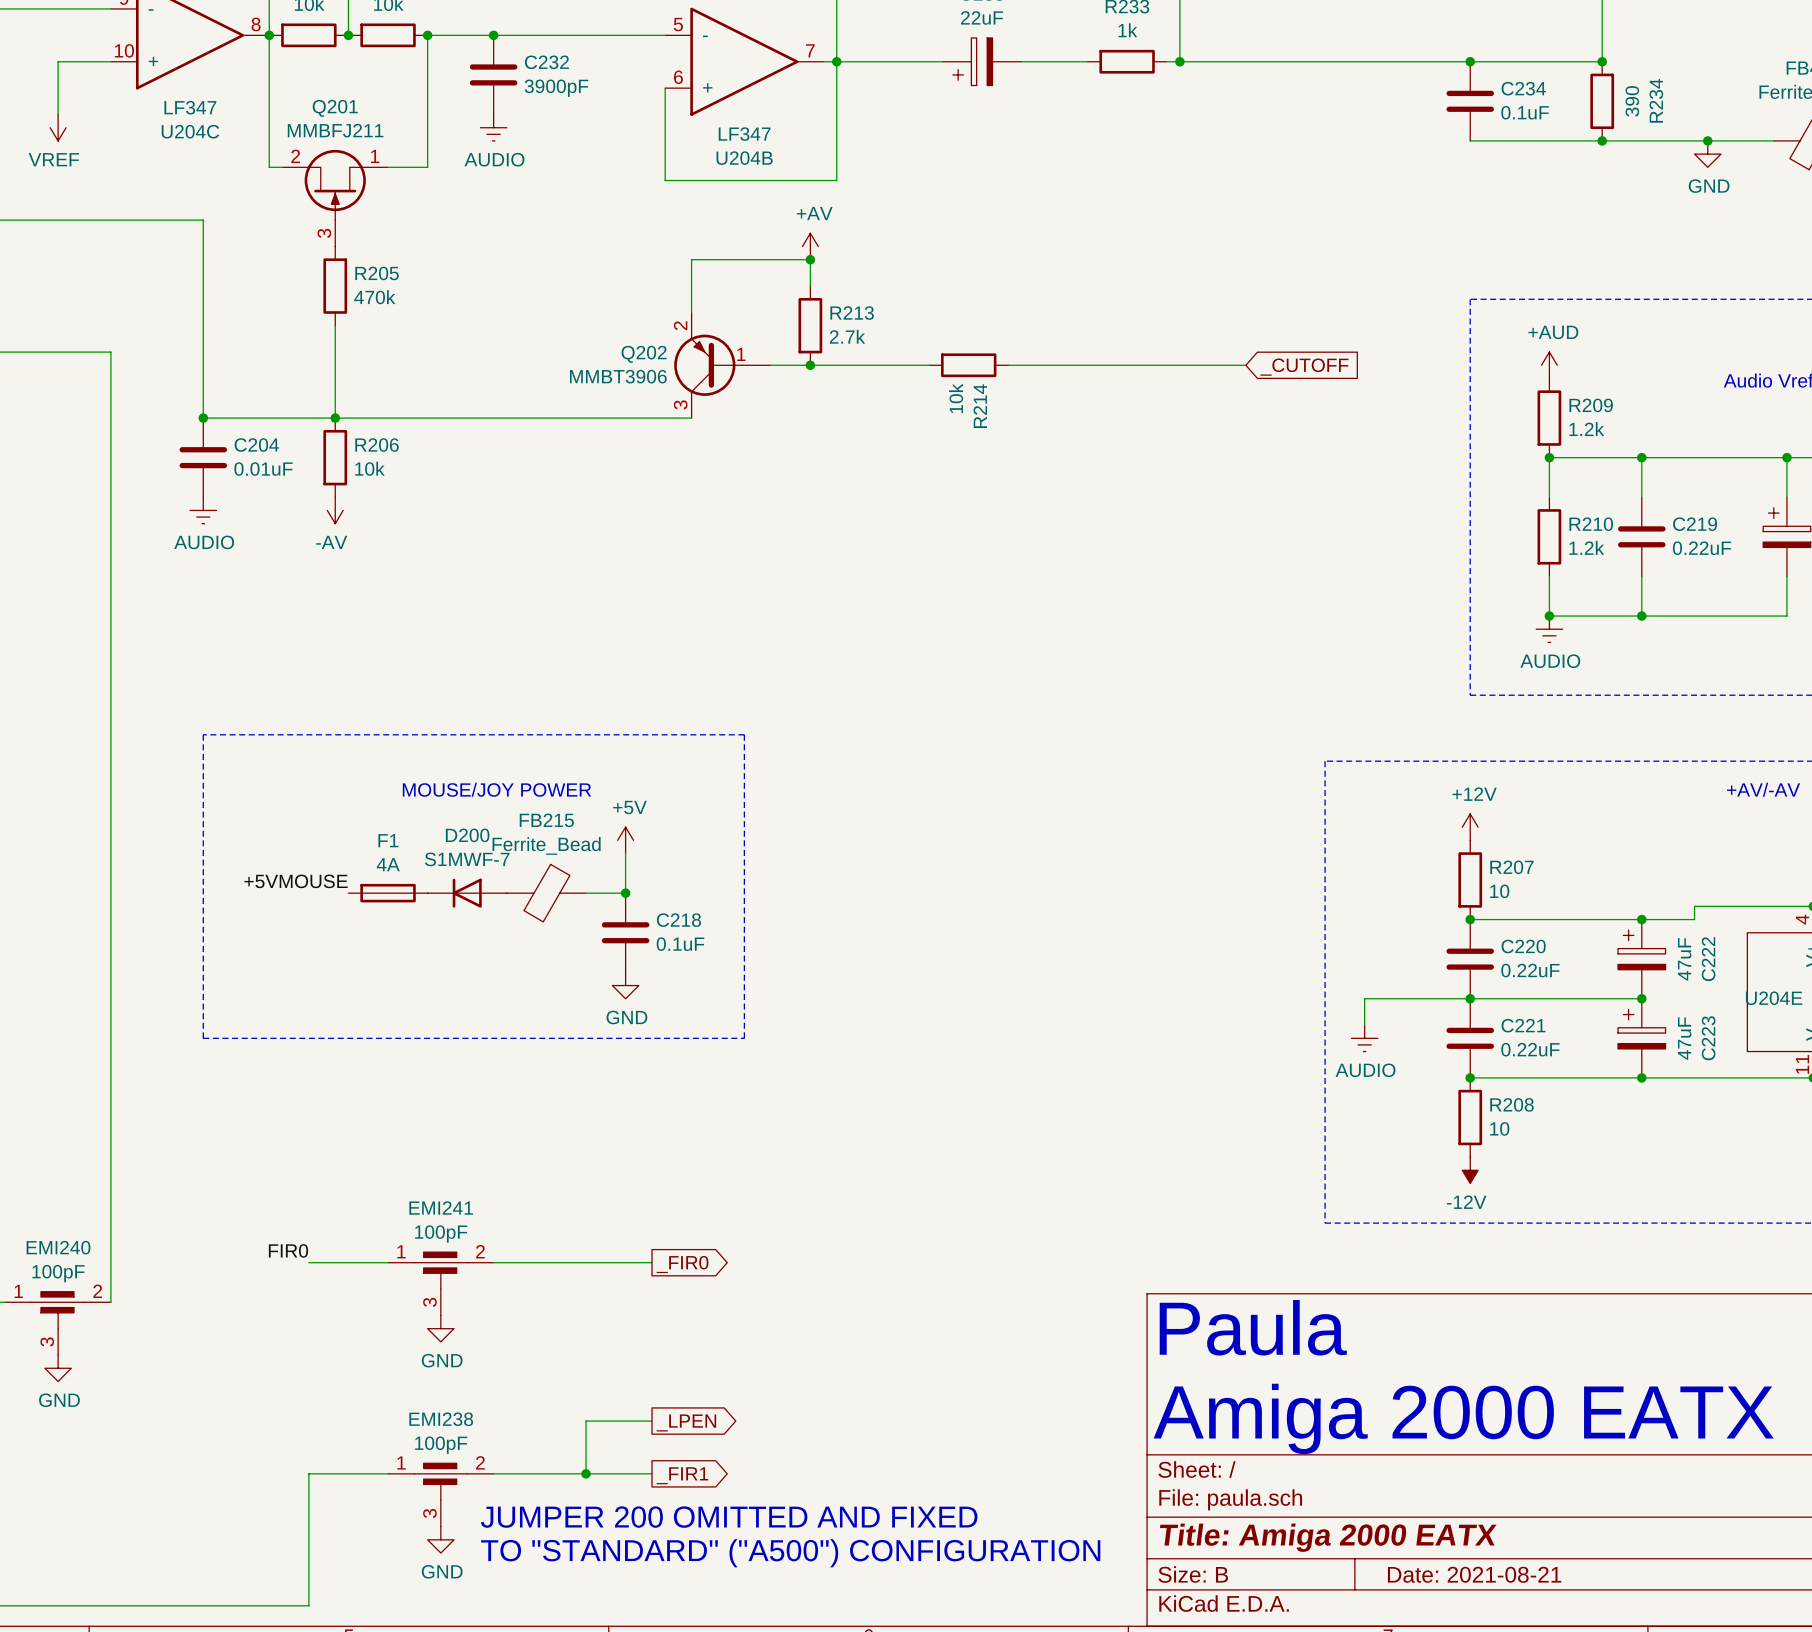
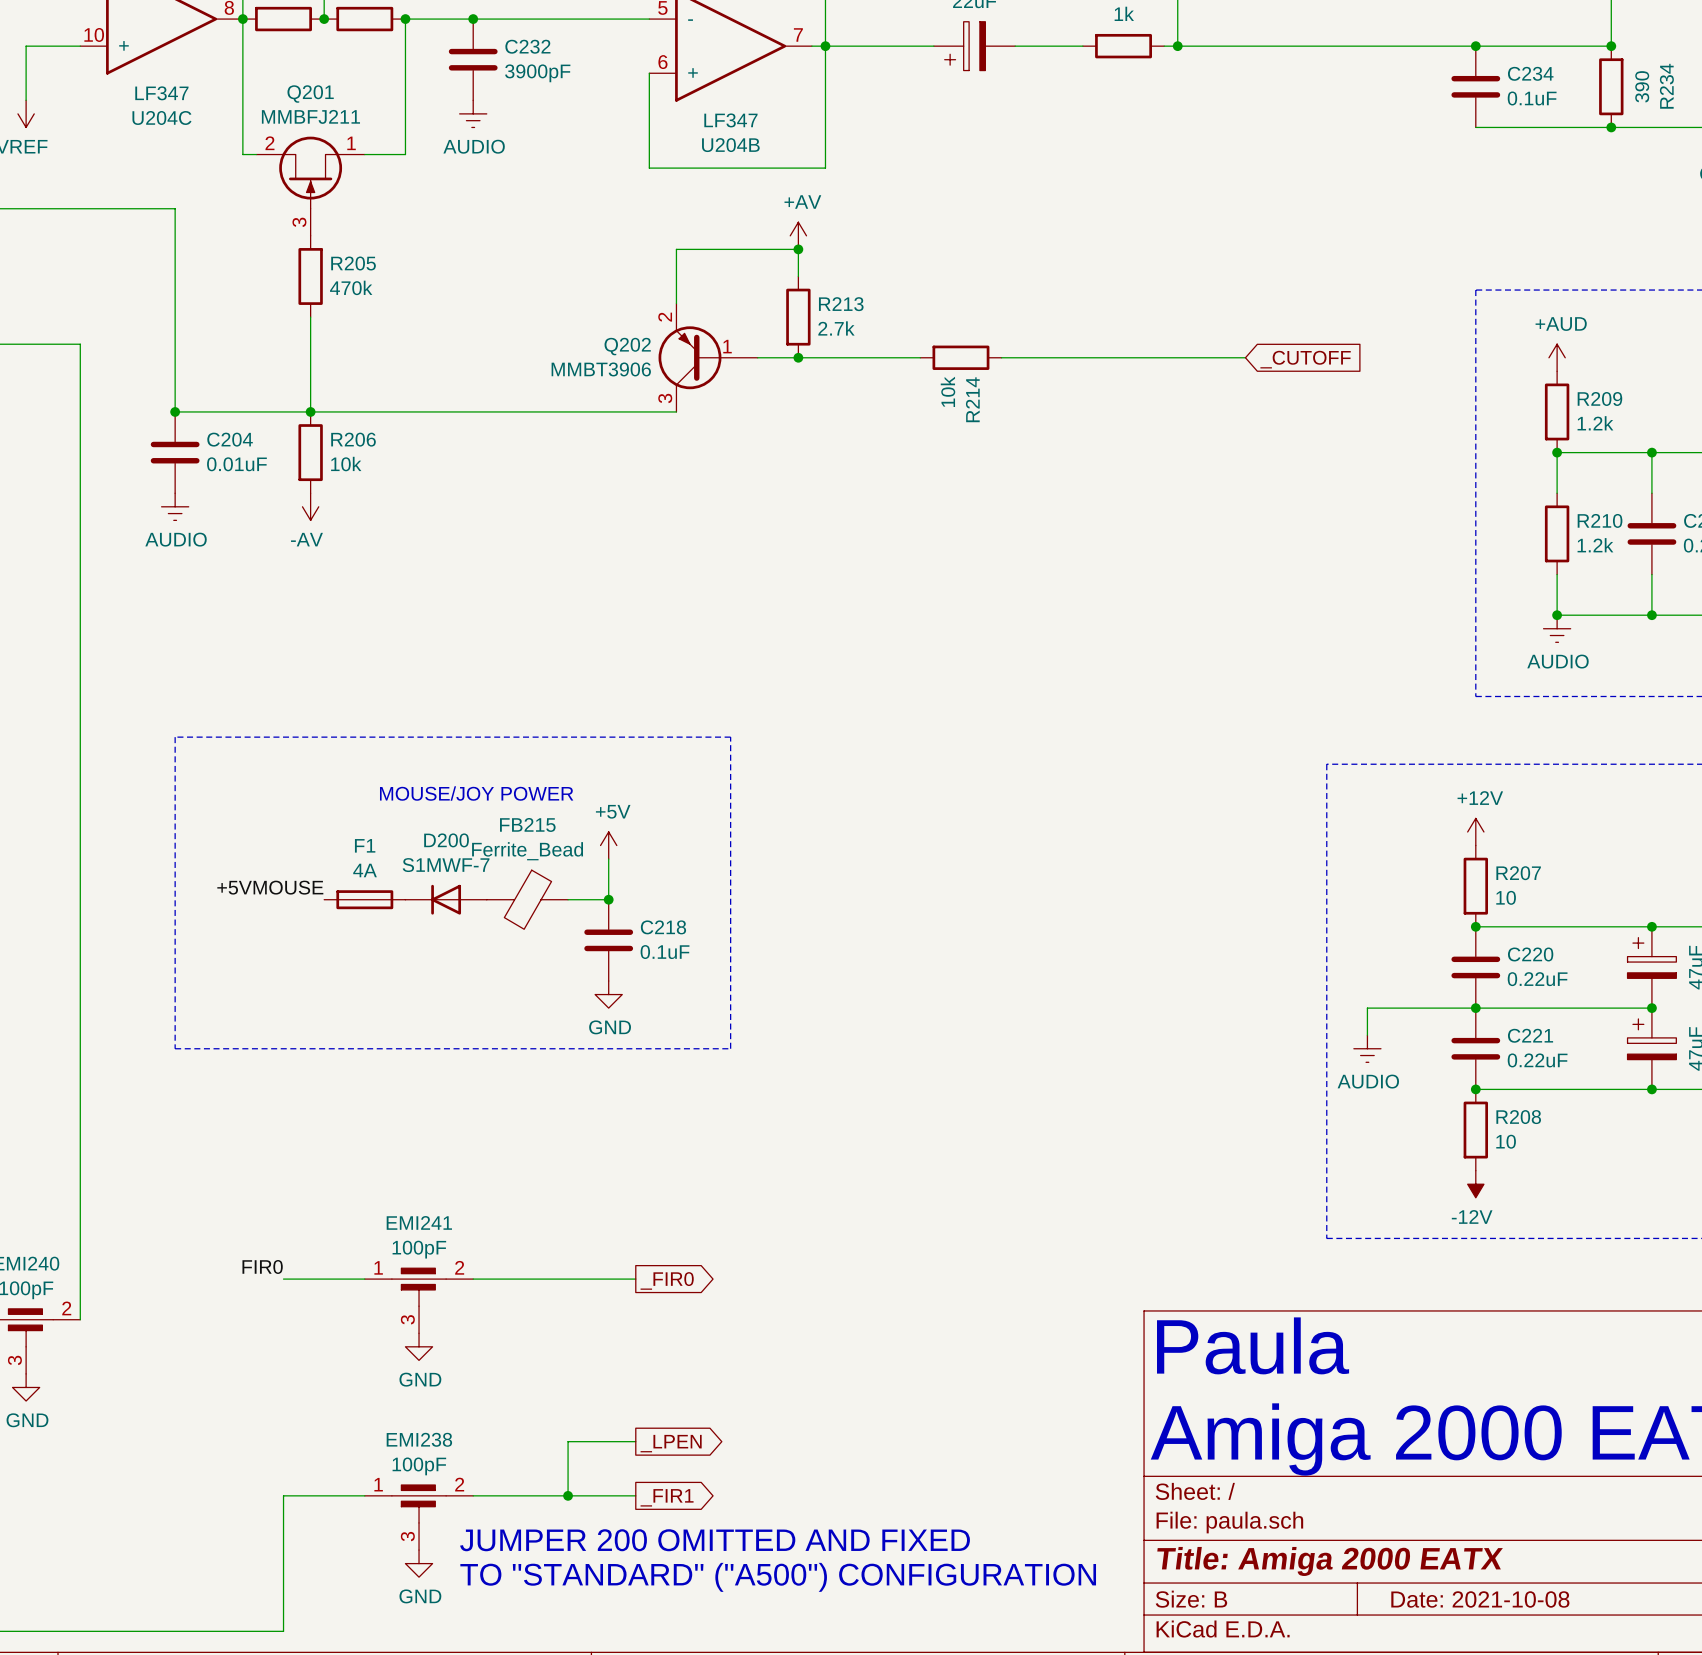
title block: Date: 2021-08-21 (1474, 1574) -> Date: 2021-10-08 (1480, 1599)

